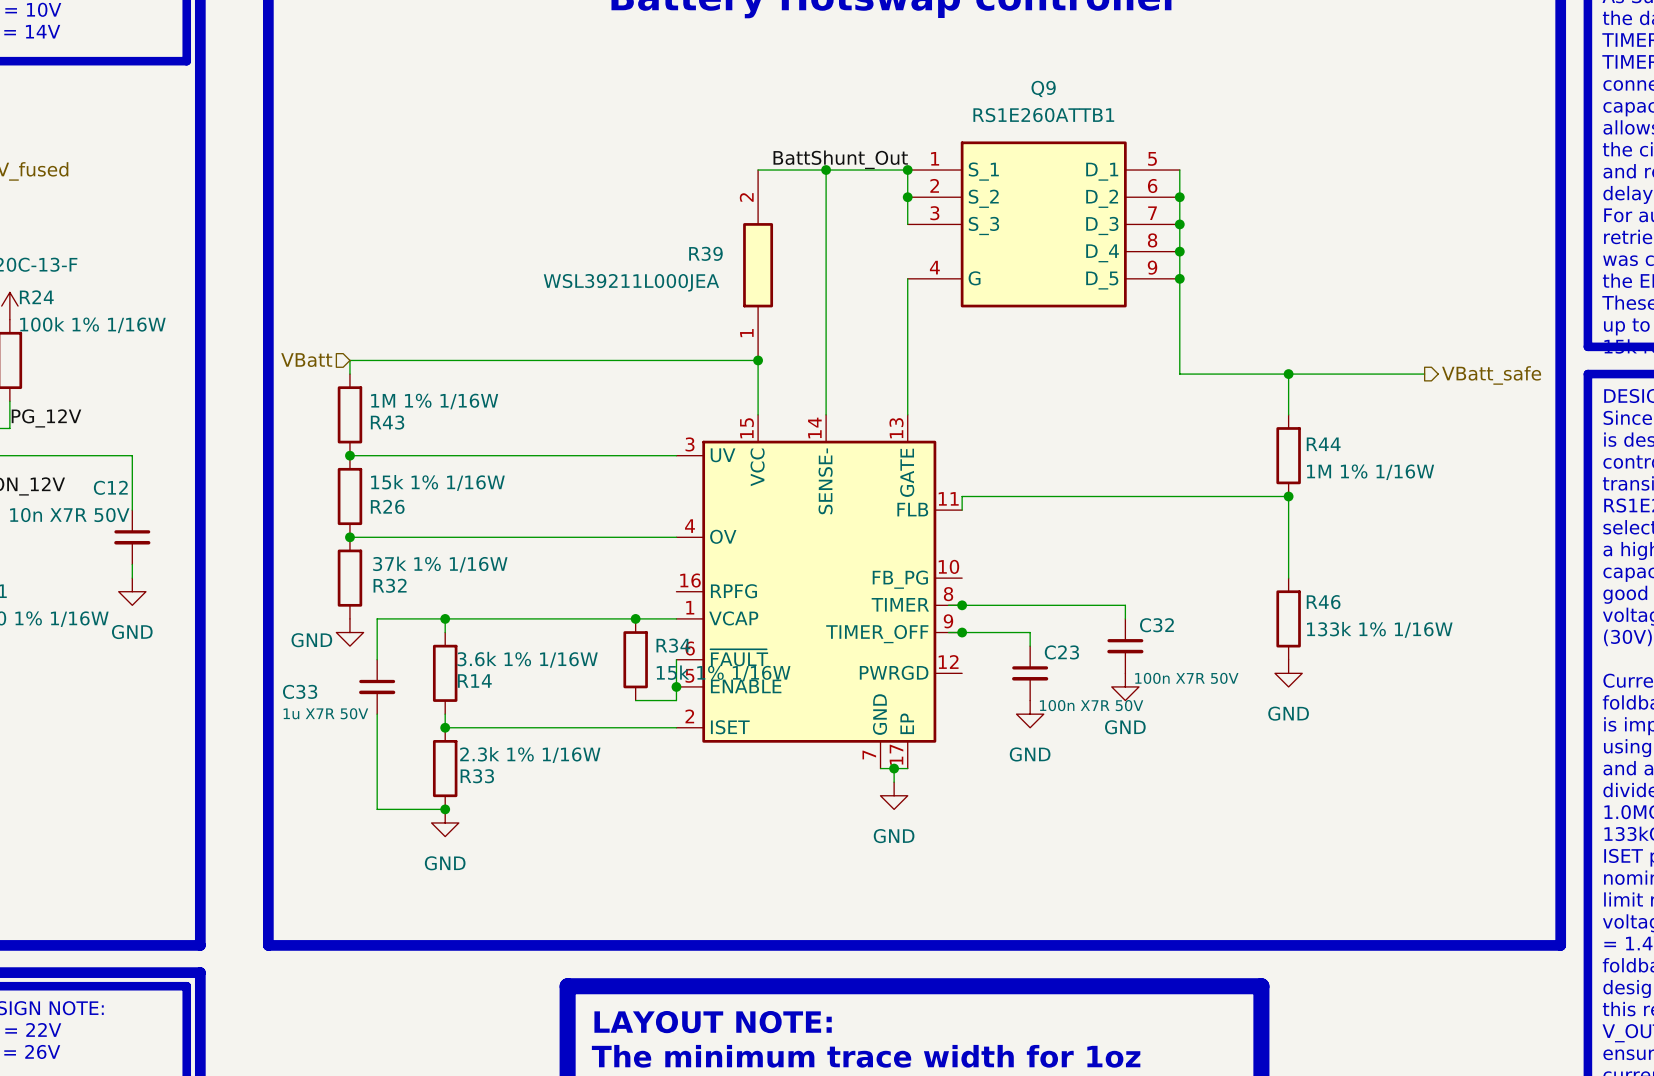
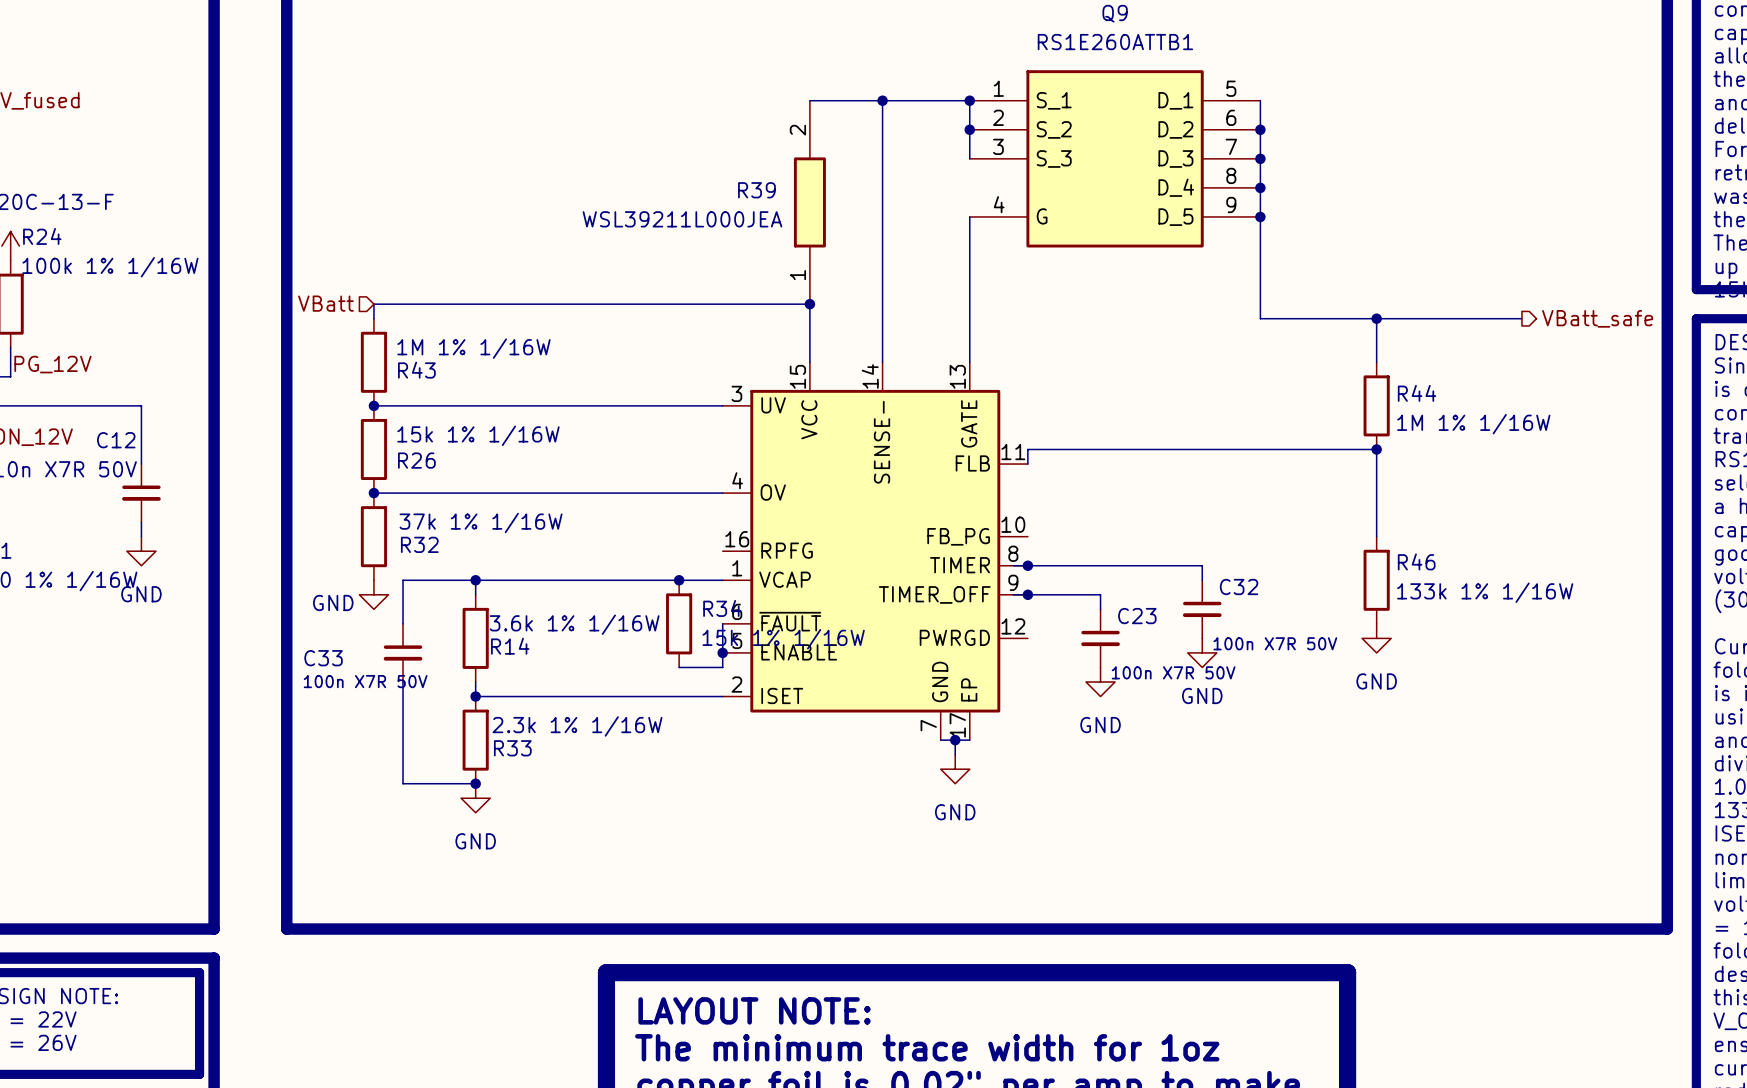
label: BattShunt_Out (840, 159) -> none
C33 value: 1u X7R 50V (325, 713) -> 100n X7R 50V (365, 681)

